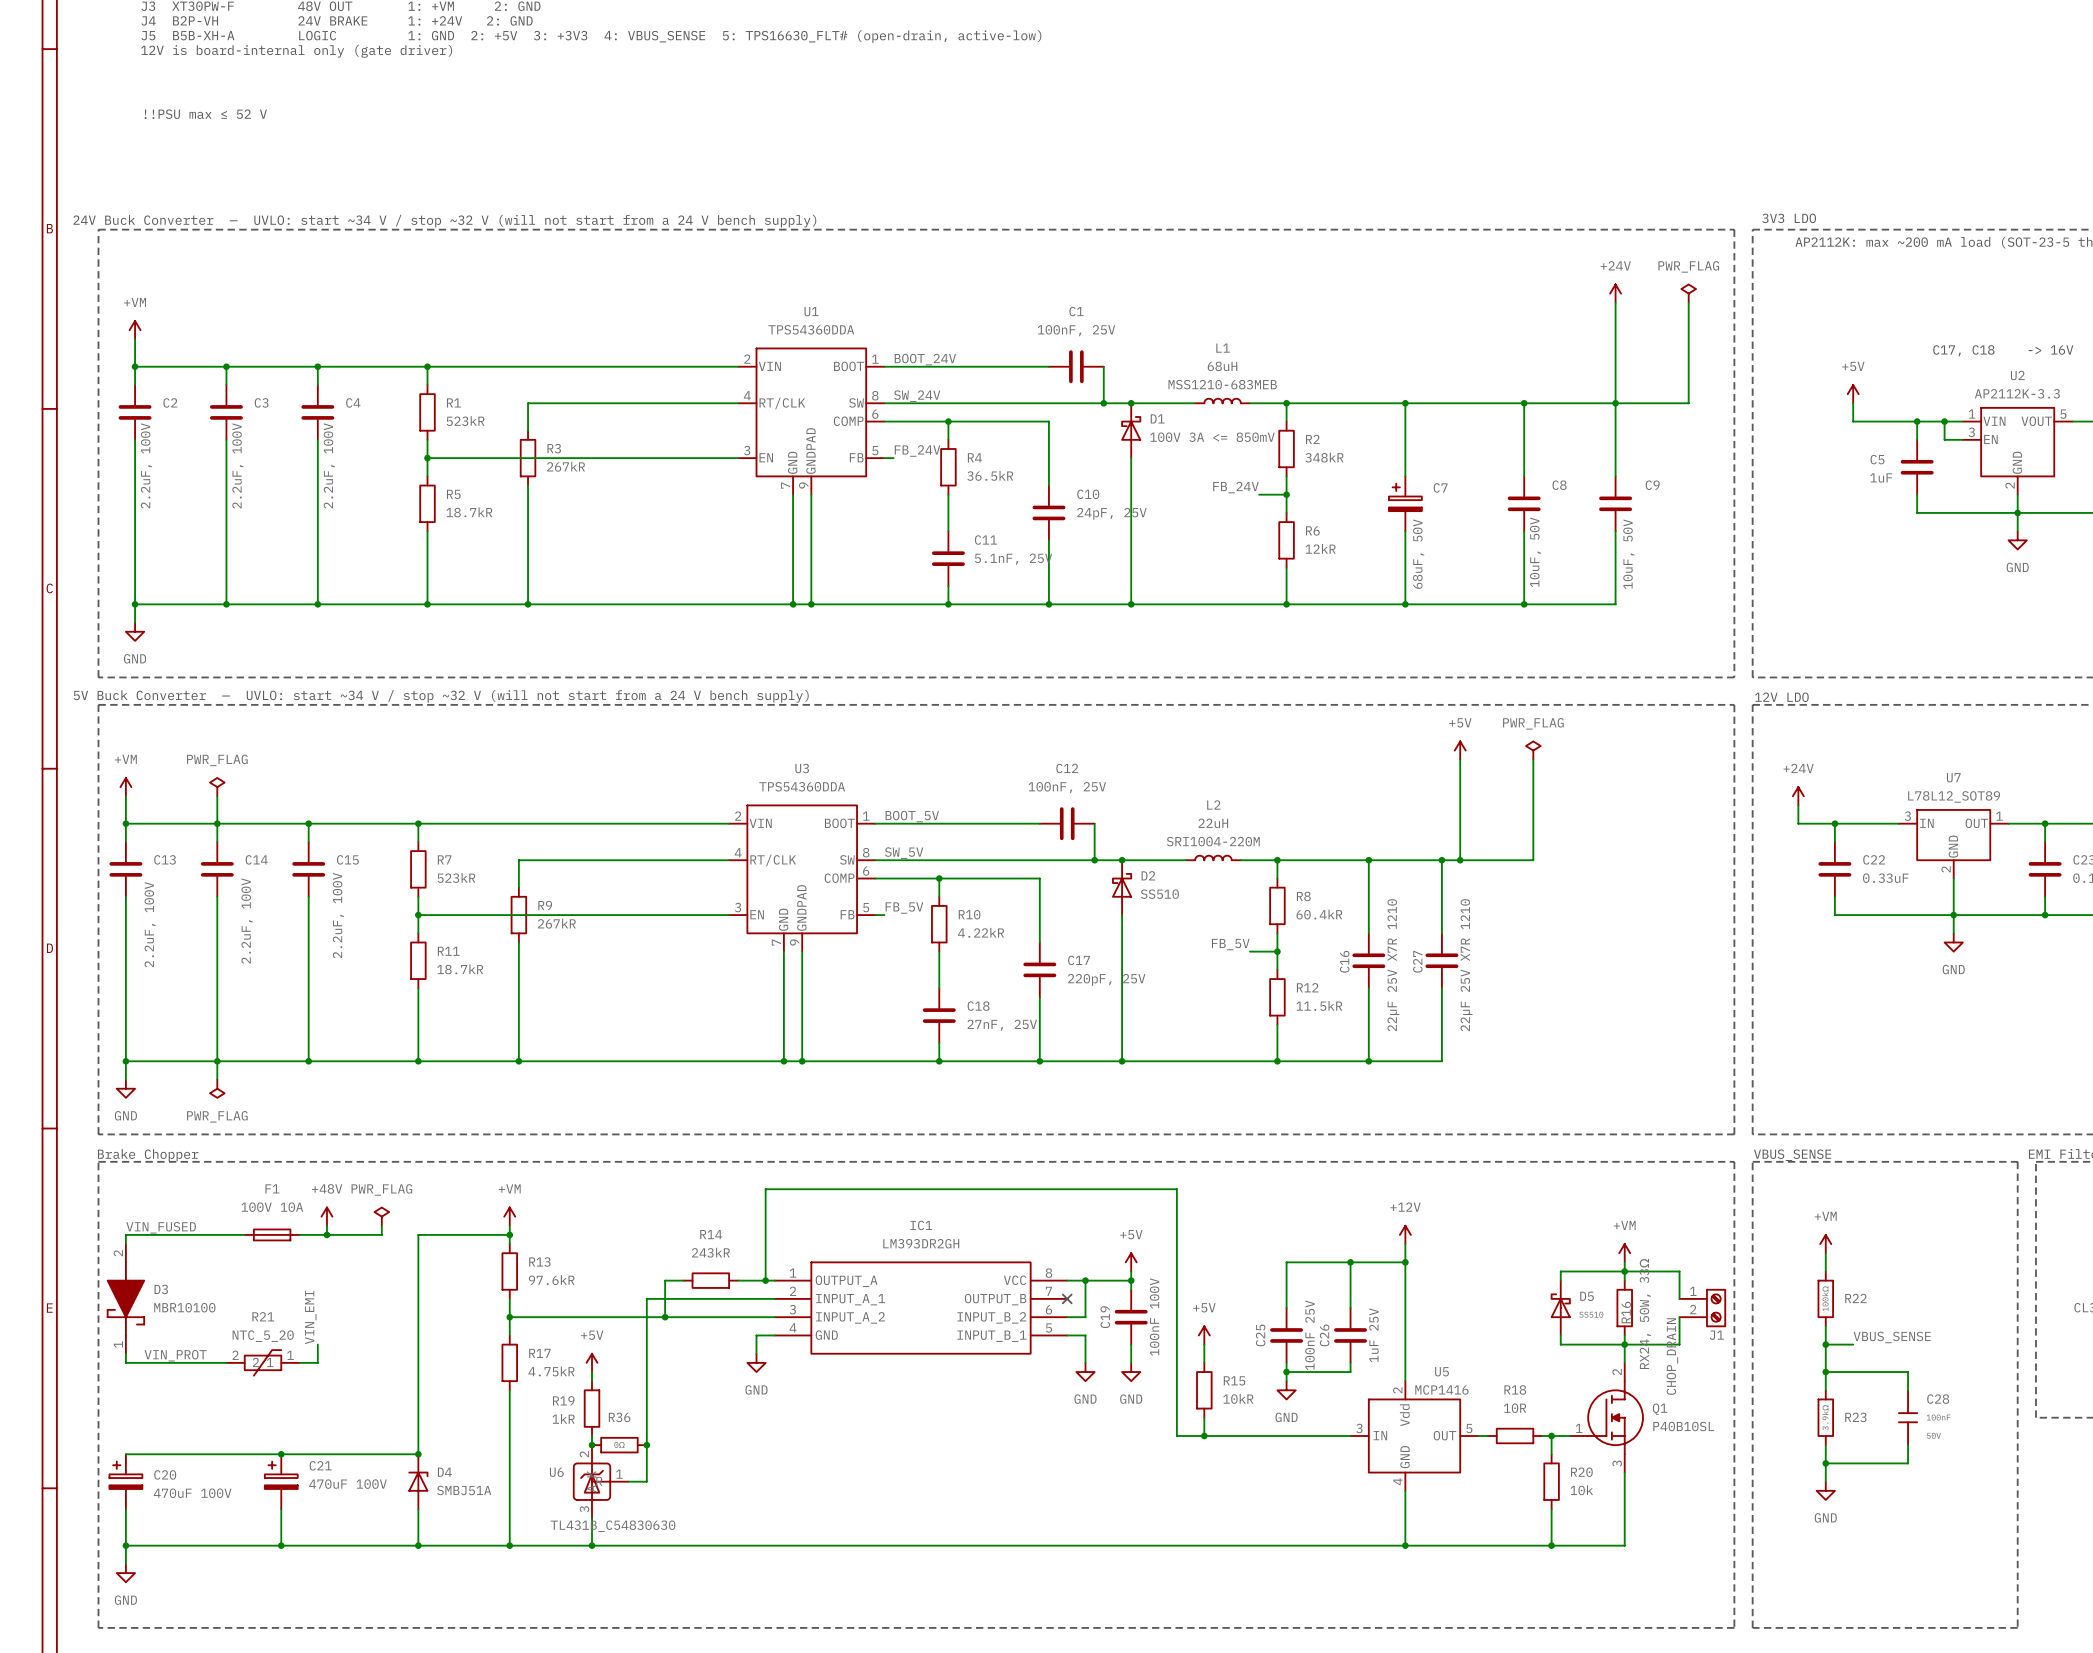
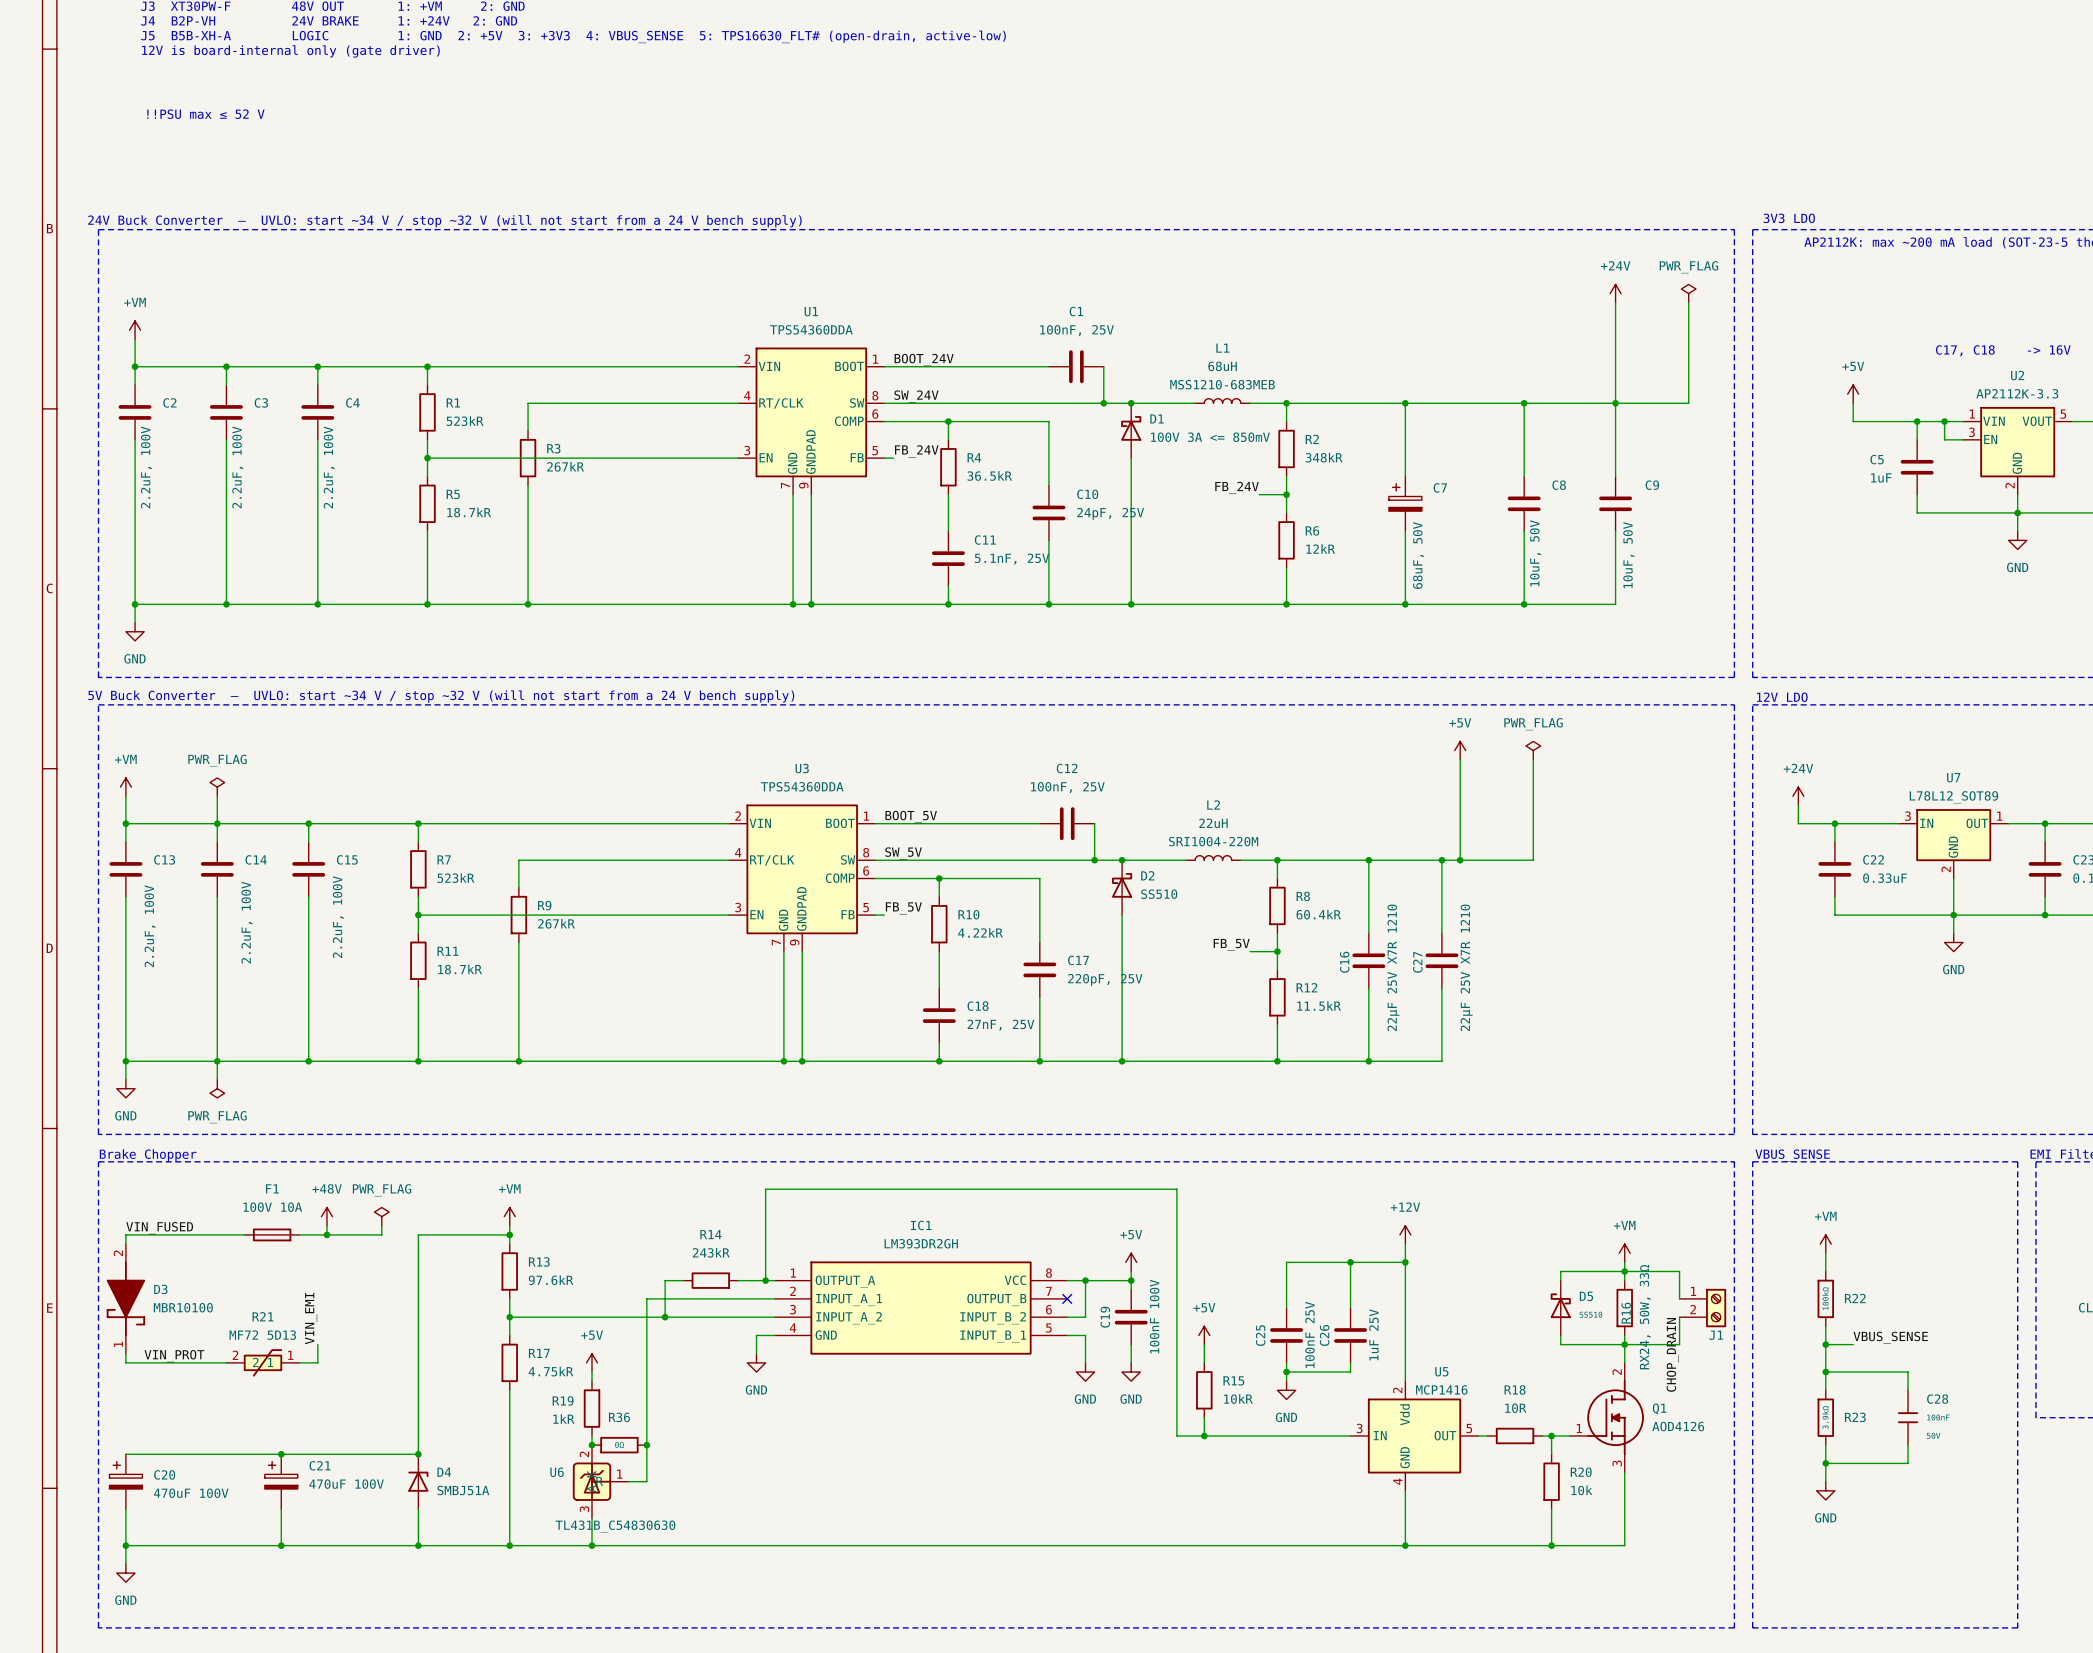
R21 value: NTC_5_20 (263, 1336) -> MF72 5D13 (262, 1335)
Q1 value: P40B10SL (1683, 1426) -> AOD4126 (1678, 1426)

